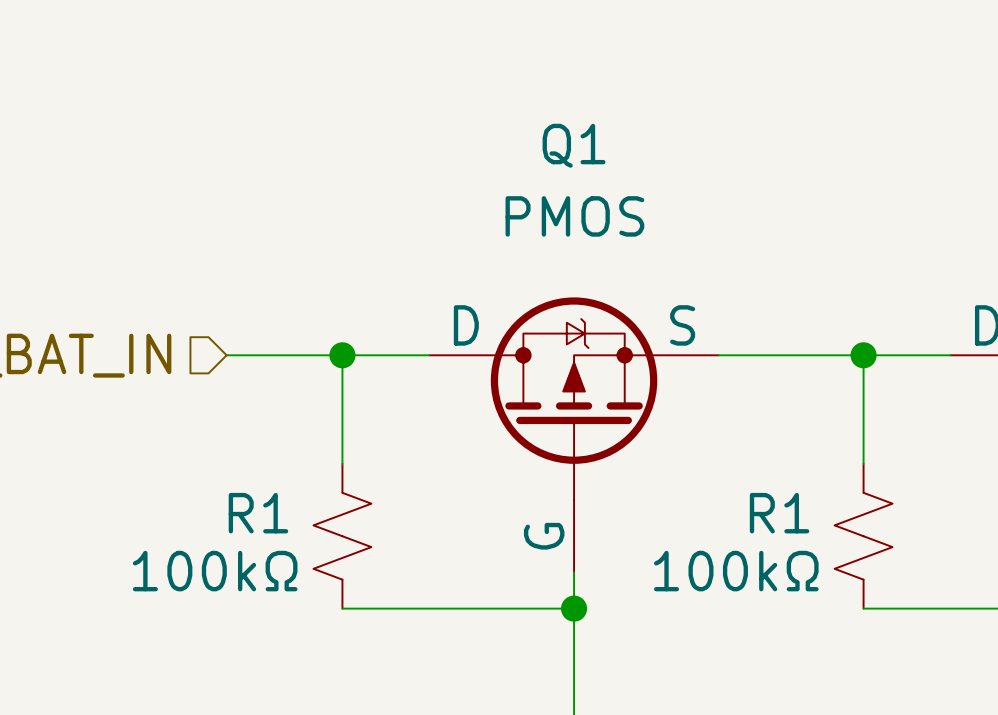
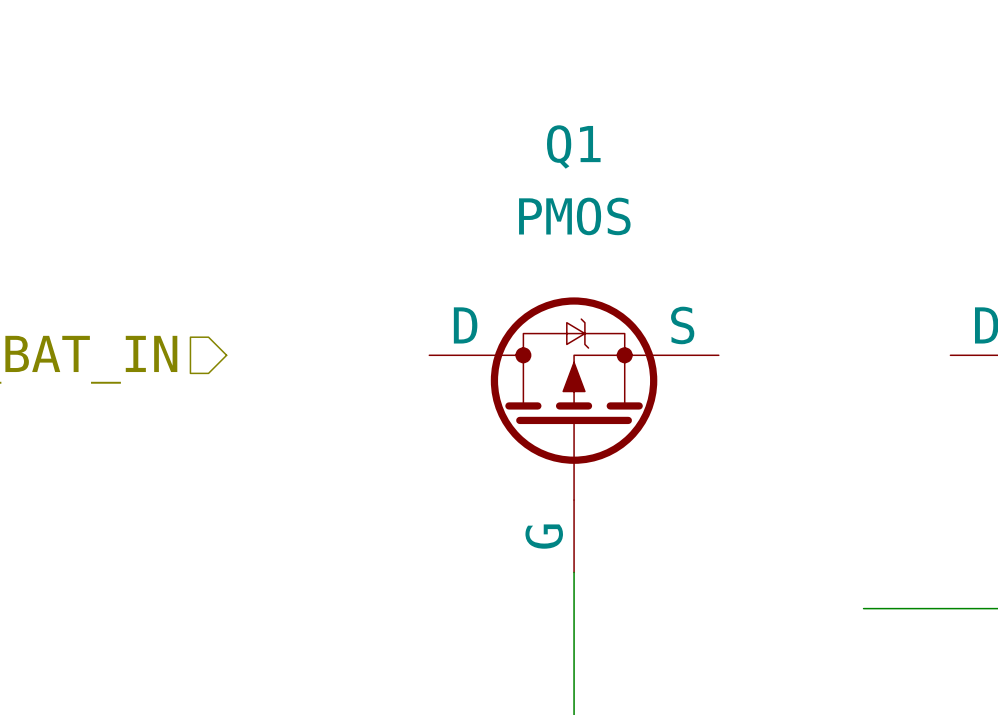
wire: (226, 355) (429, 355) -> none
wire: (342, 355) (342, 463) -> none
junction: (342, 355) -> none
wire: (718, 355) (950, 355) -> none
wire: (863, 355) (863, 463) -> none
junction: (863, 355) -> none
R1: 100kΩ (342, 536) -> none
R1: 100kΩ (863, 536) -> none
wire: (342, 608) (574, 608) -> none
junction: (574, 608) -> none

